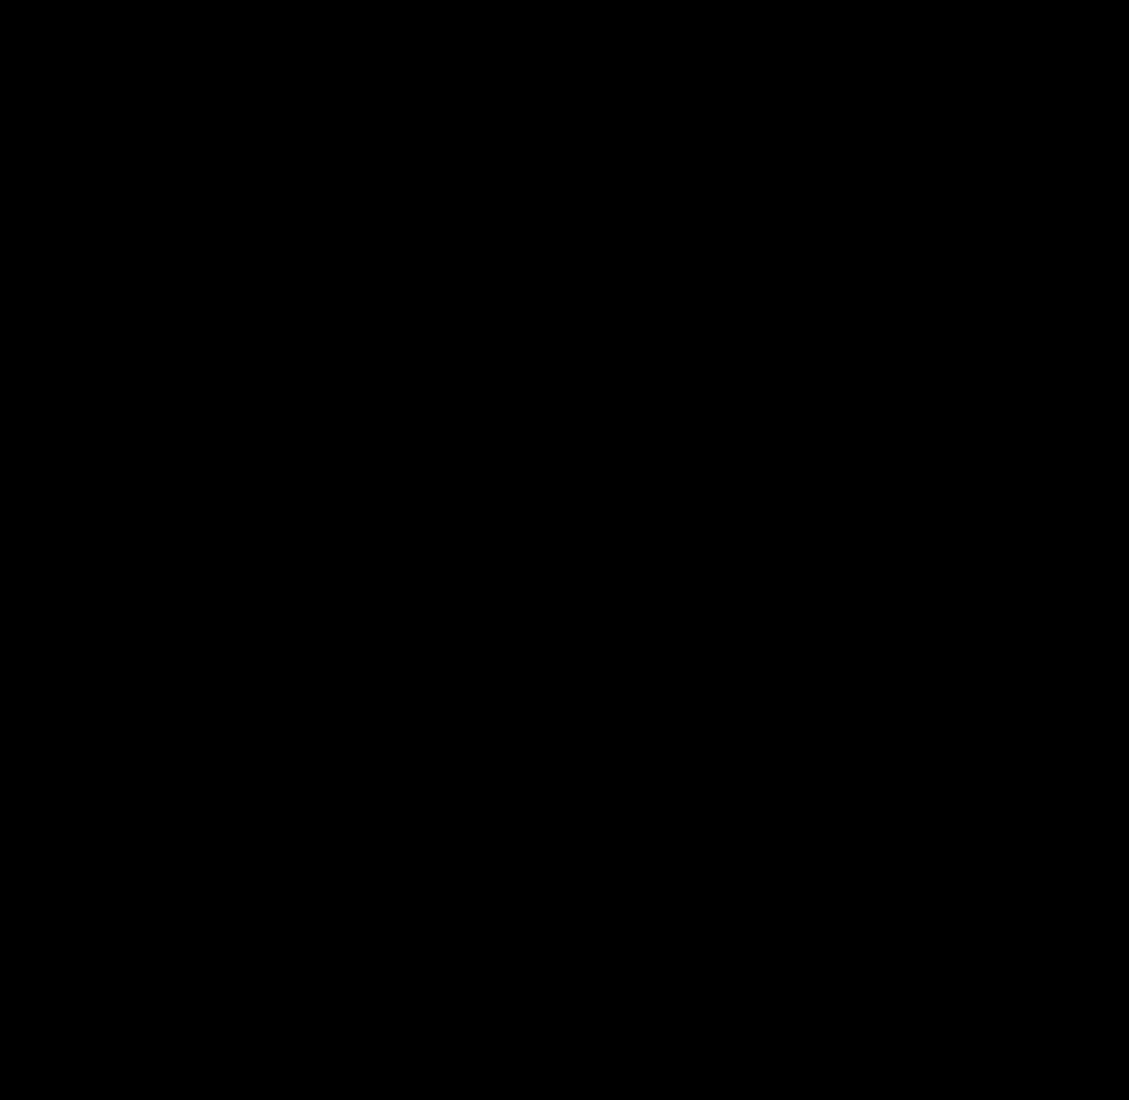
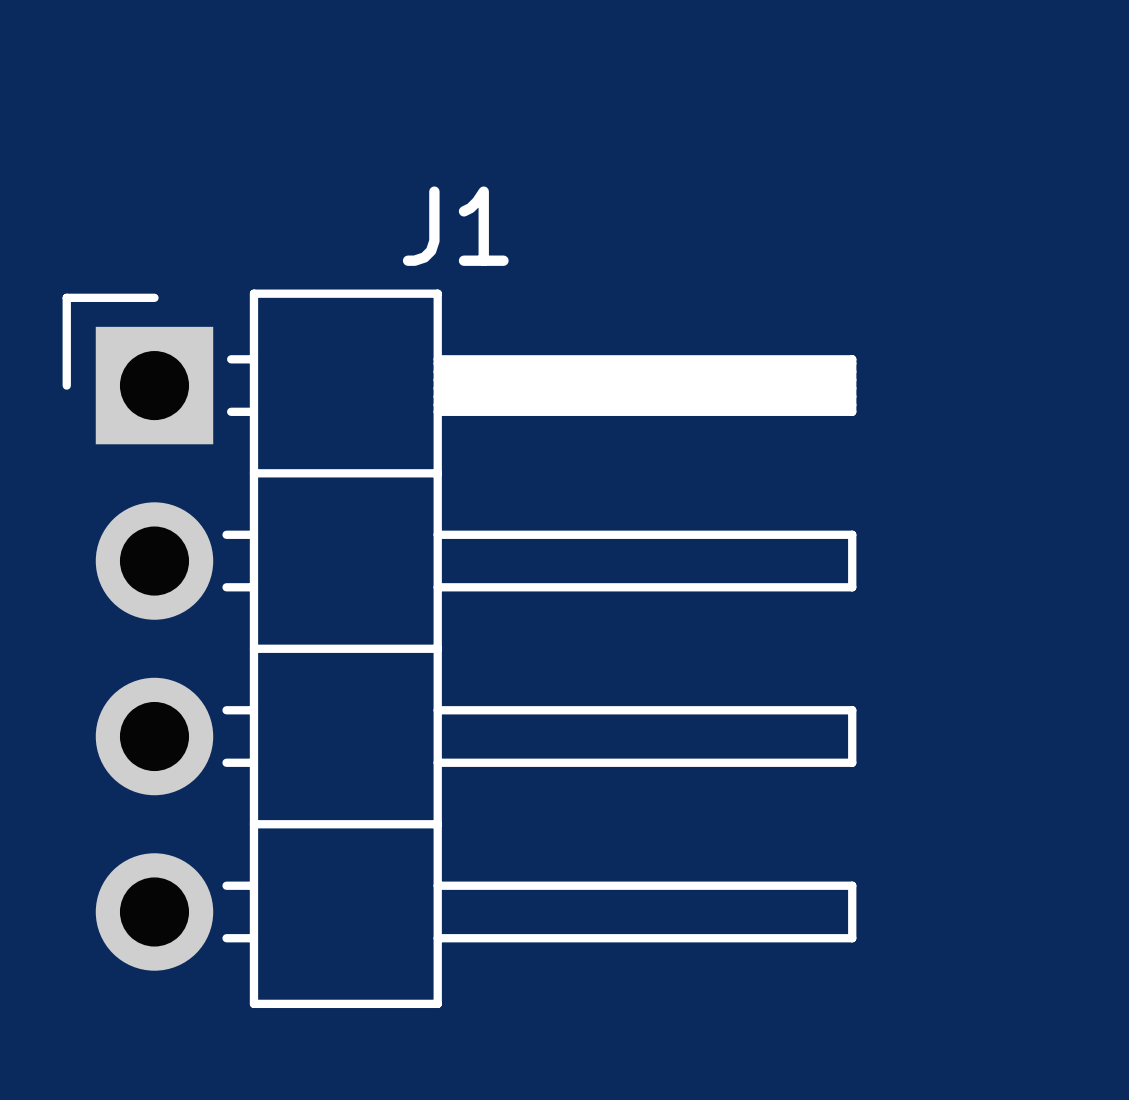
J1: none -> (459, 648)

